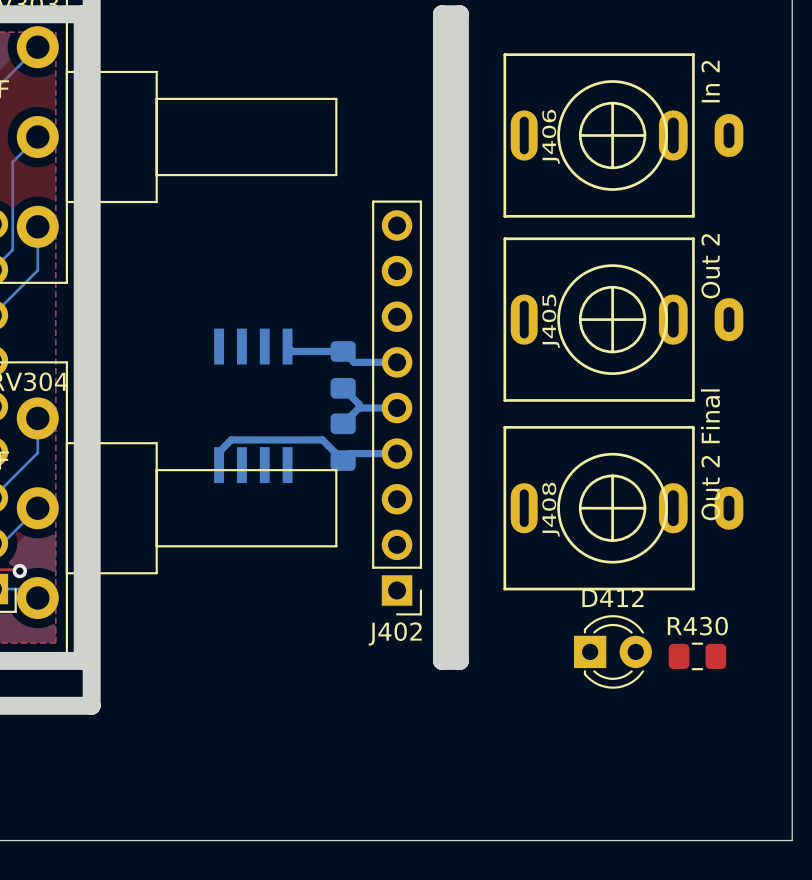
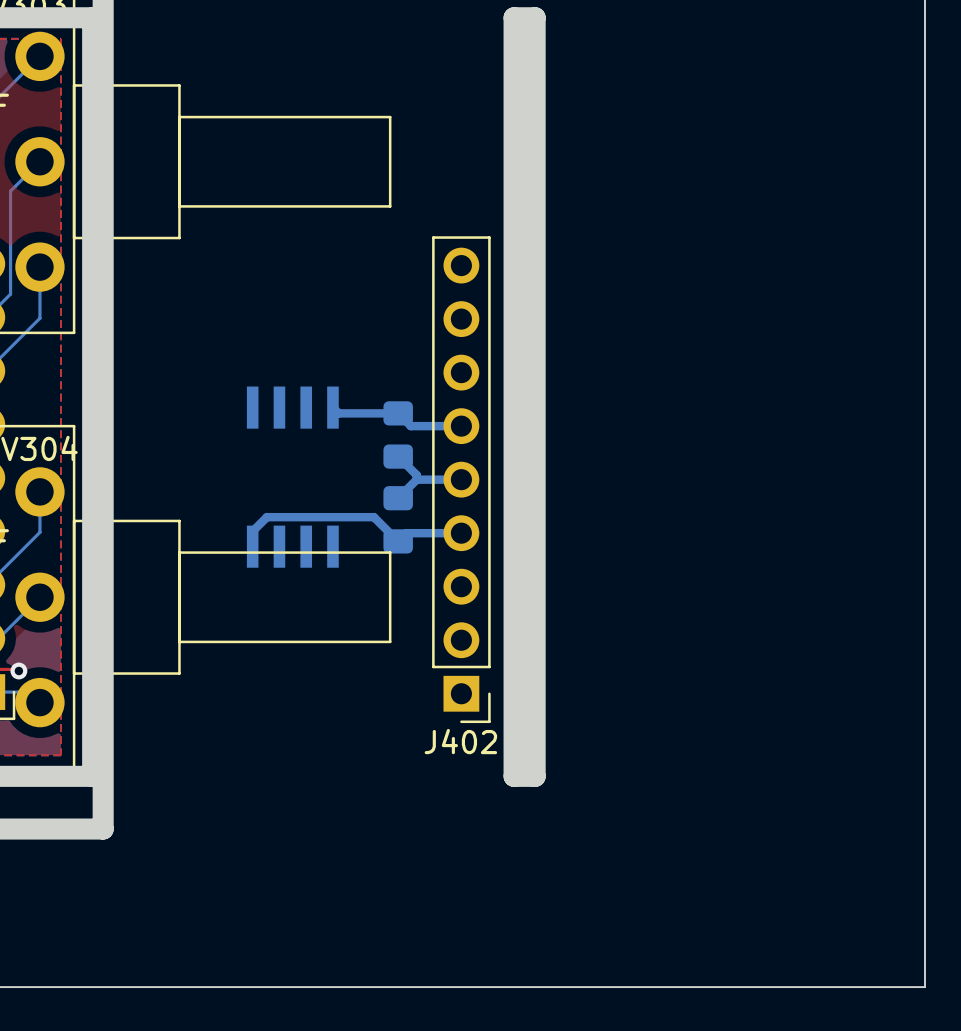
J406: In 2 (623, 135) -> none
J405: Out 2 (623, 319) -> none
J408: Out 2 Final (623, 508) -> none
D412: (612, 651) -> none
R430: (697, 656) -> none

